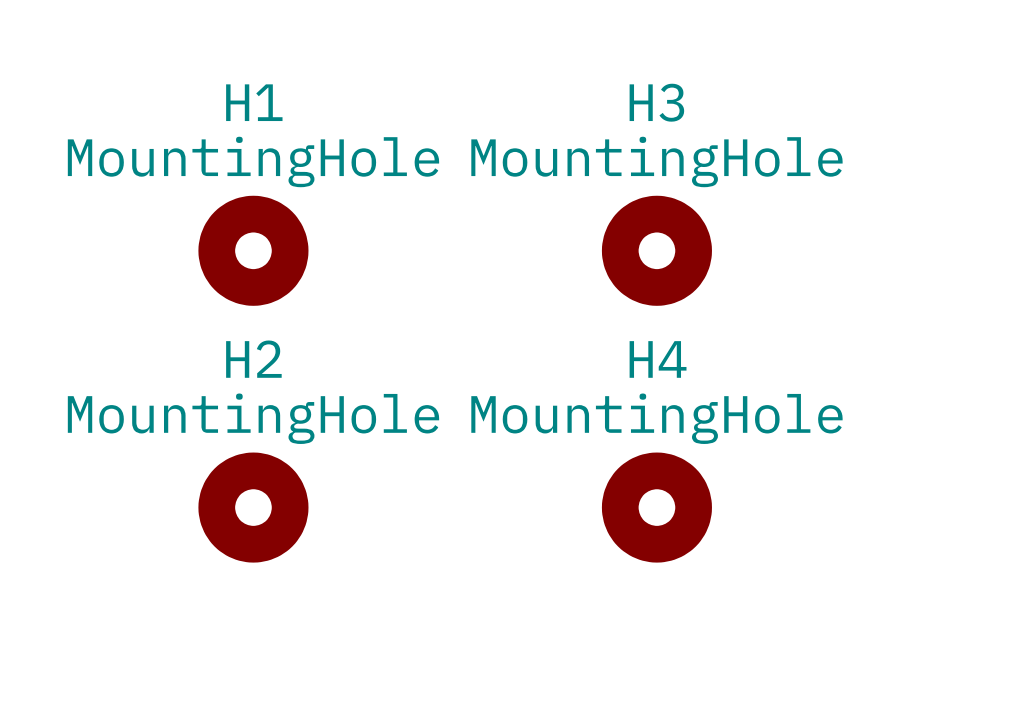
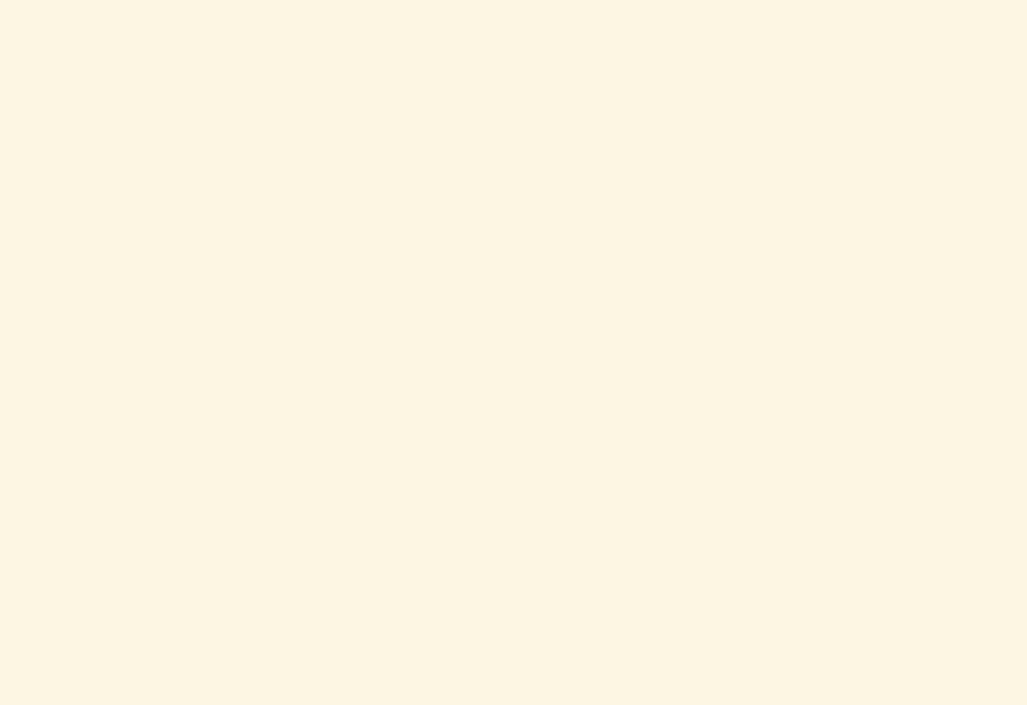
H1: MountingHole (253, 250) -> none
H3: MountingHole (656, 250) -> none
H2: MountingHole (253, 507) -> none
H4: MountingHole (656, 507) -> none

